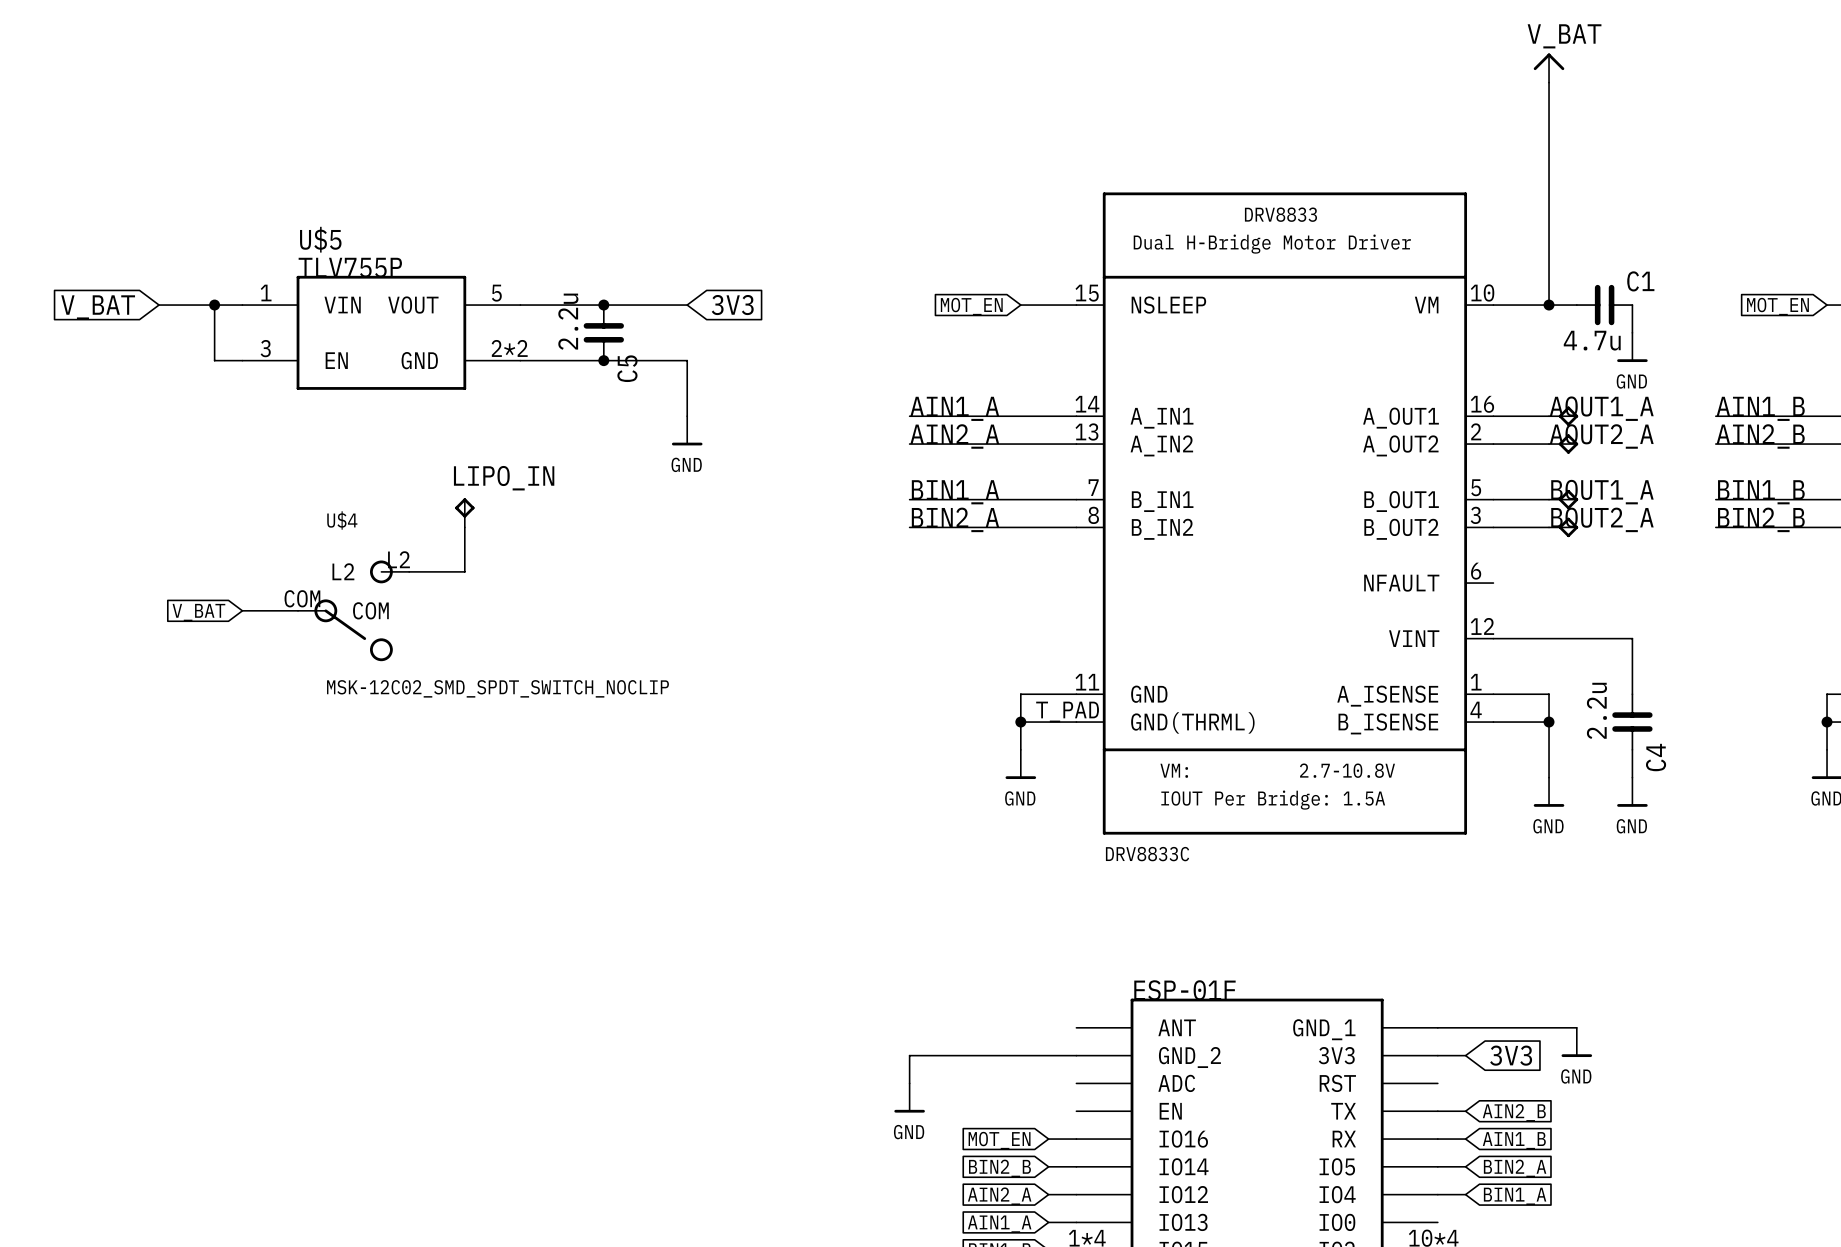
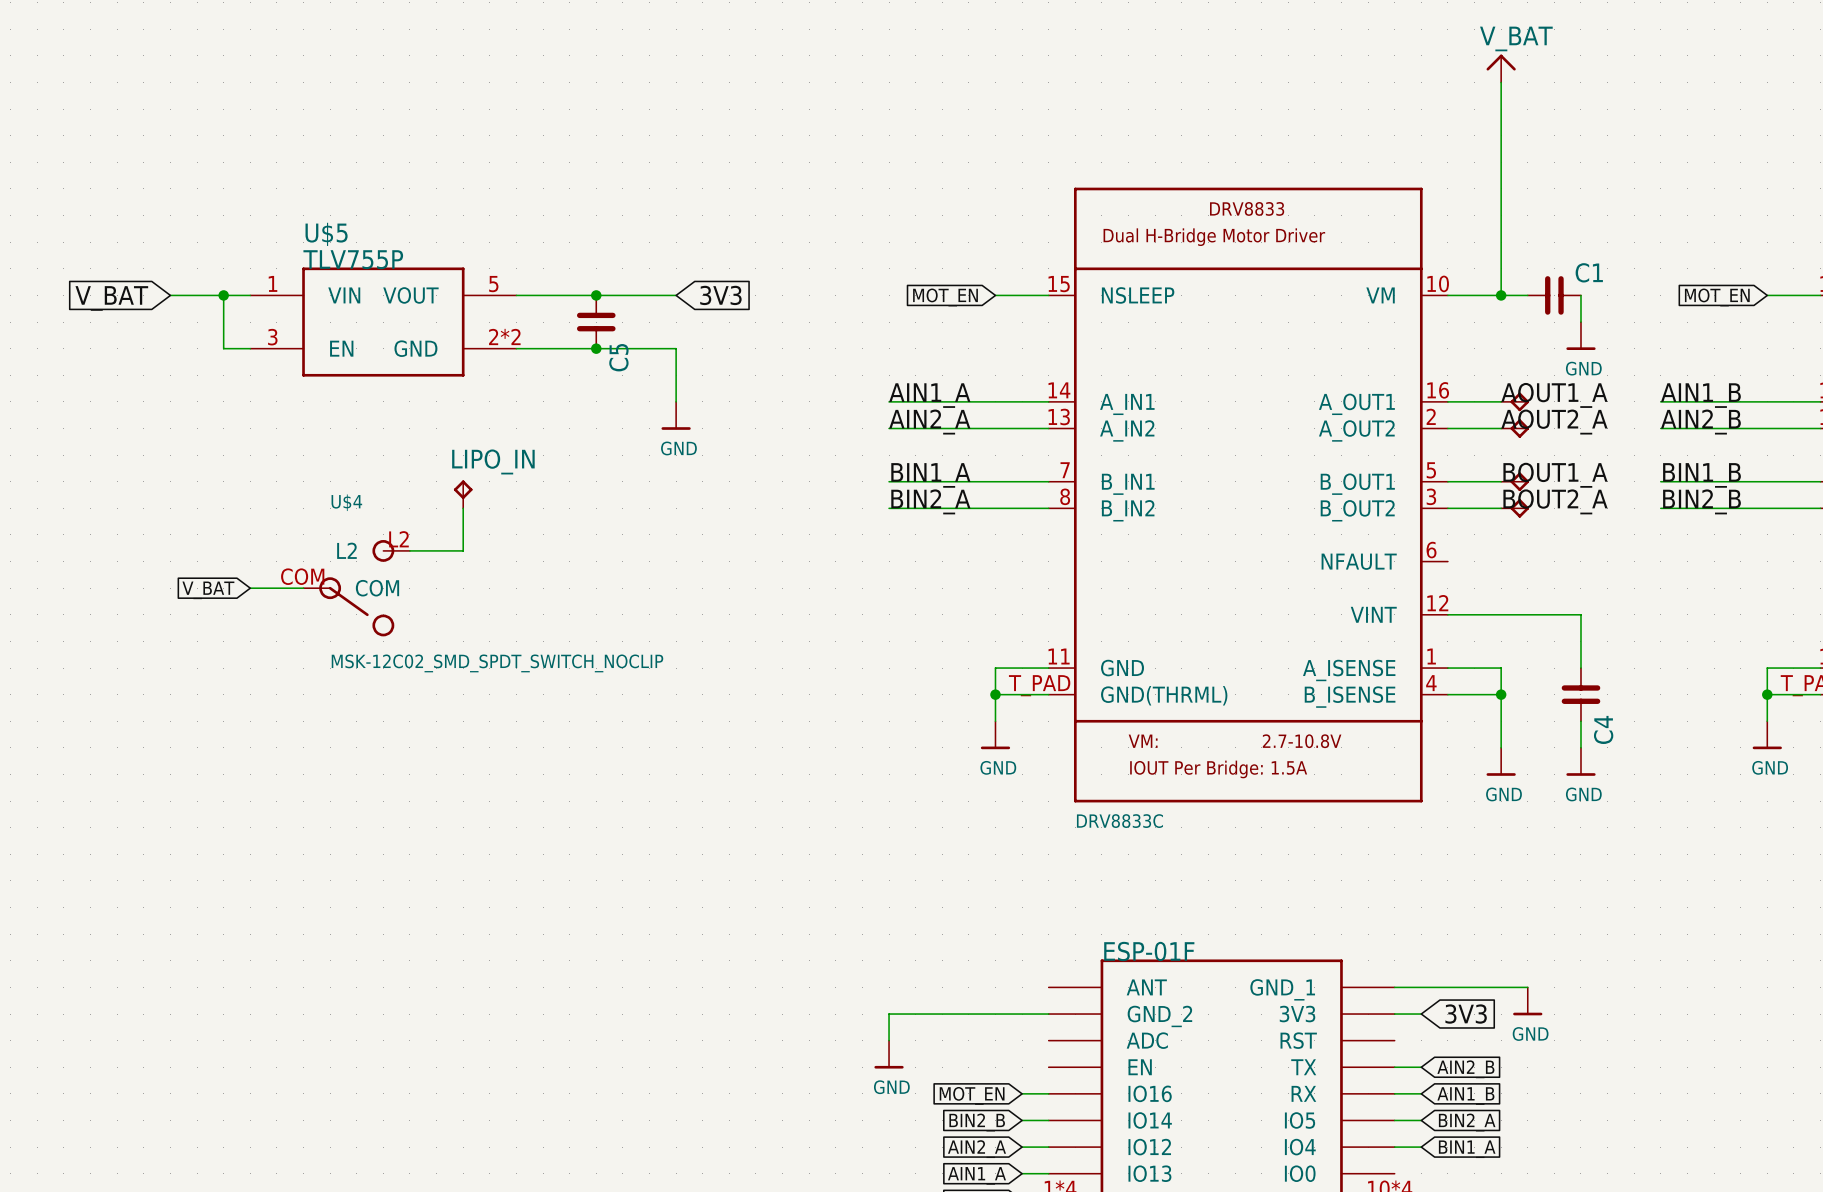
C5 value: 2.2u (568, 321) -> none
C1 value: 4.7u (1592, 340) -> none
C4 value: 2.2u (1596, 710) -> none

